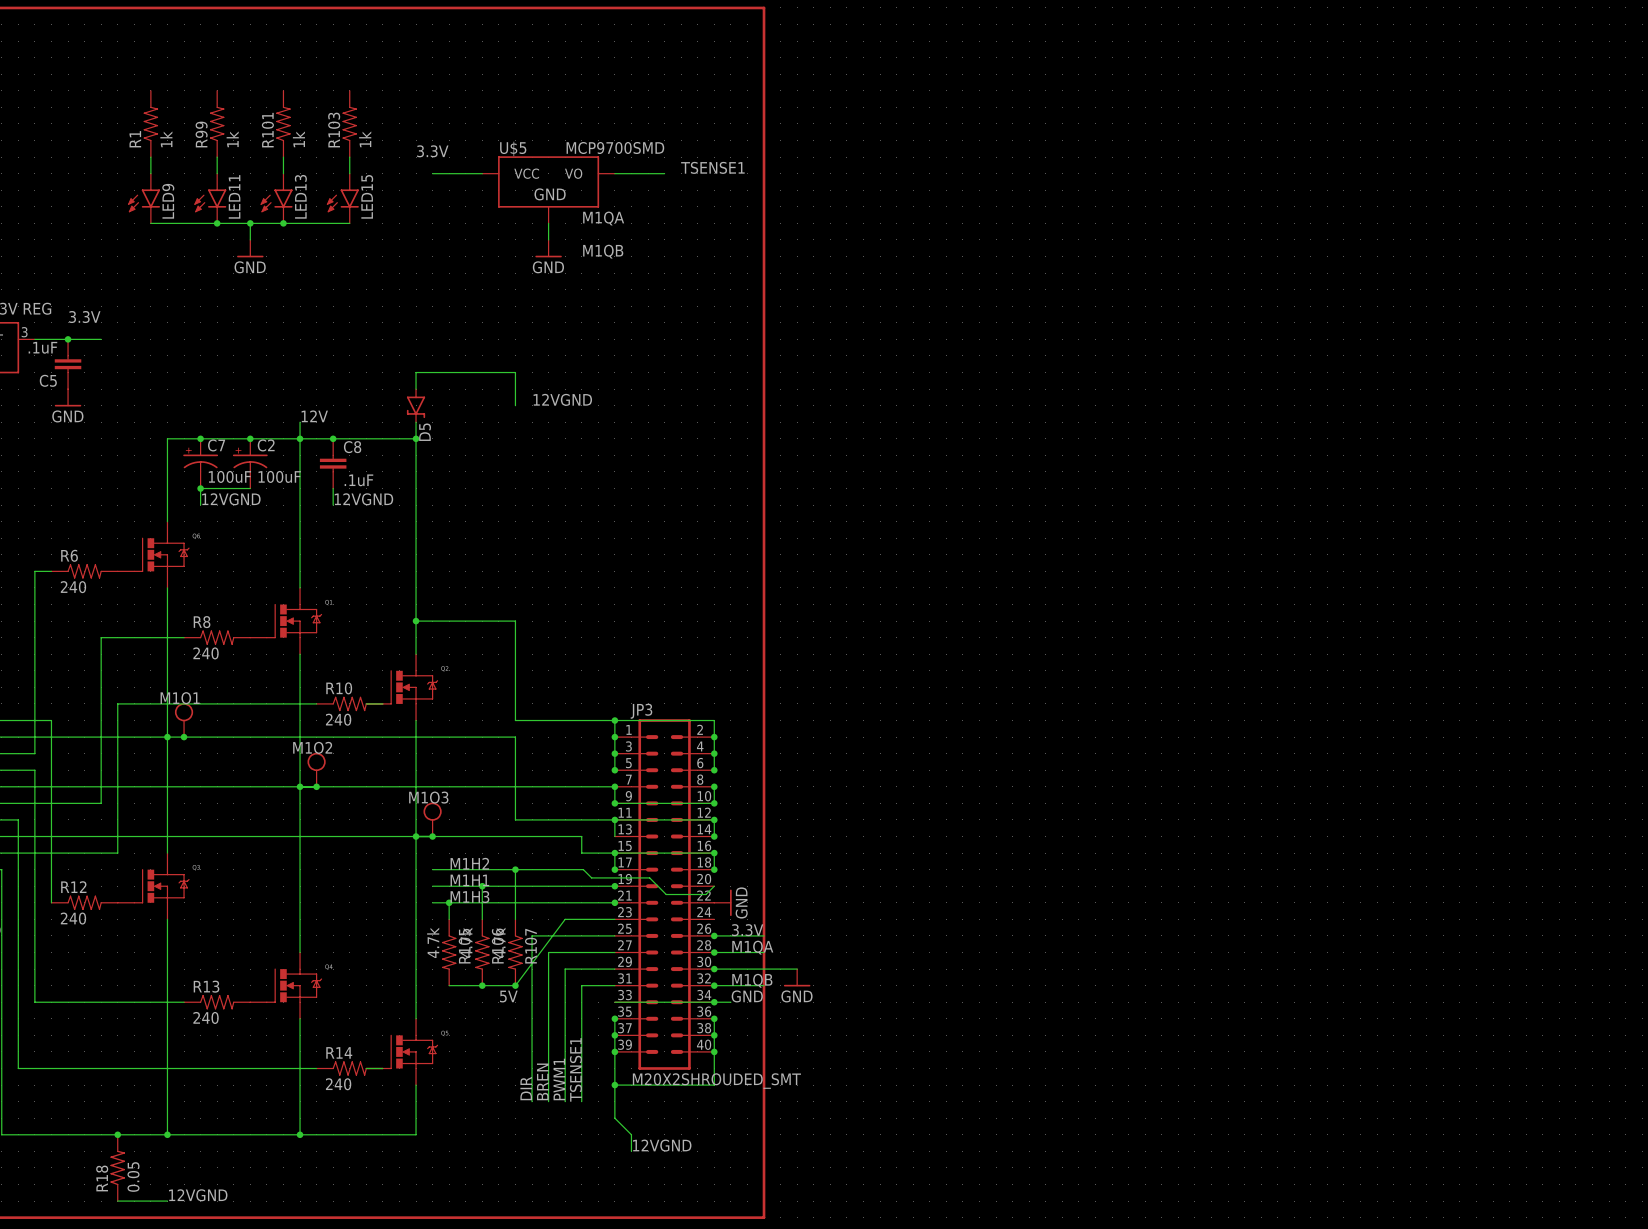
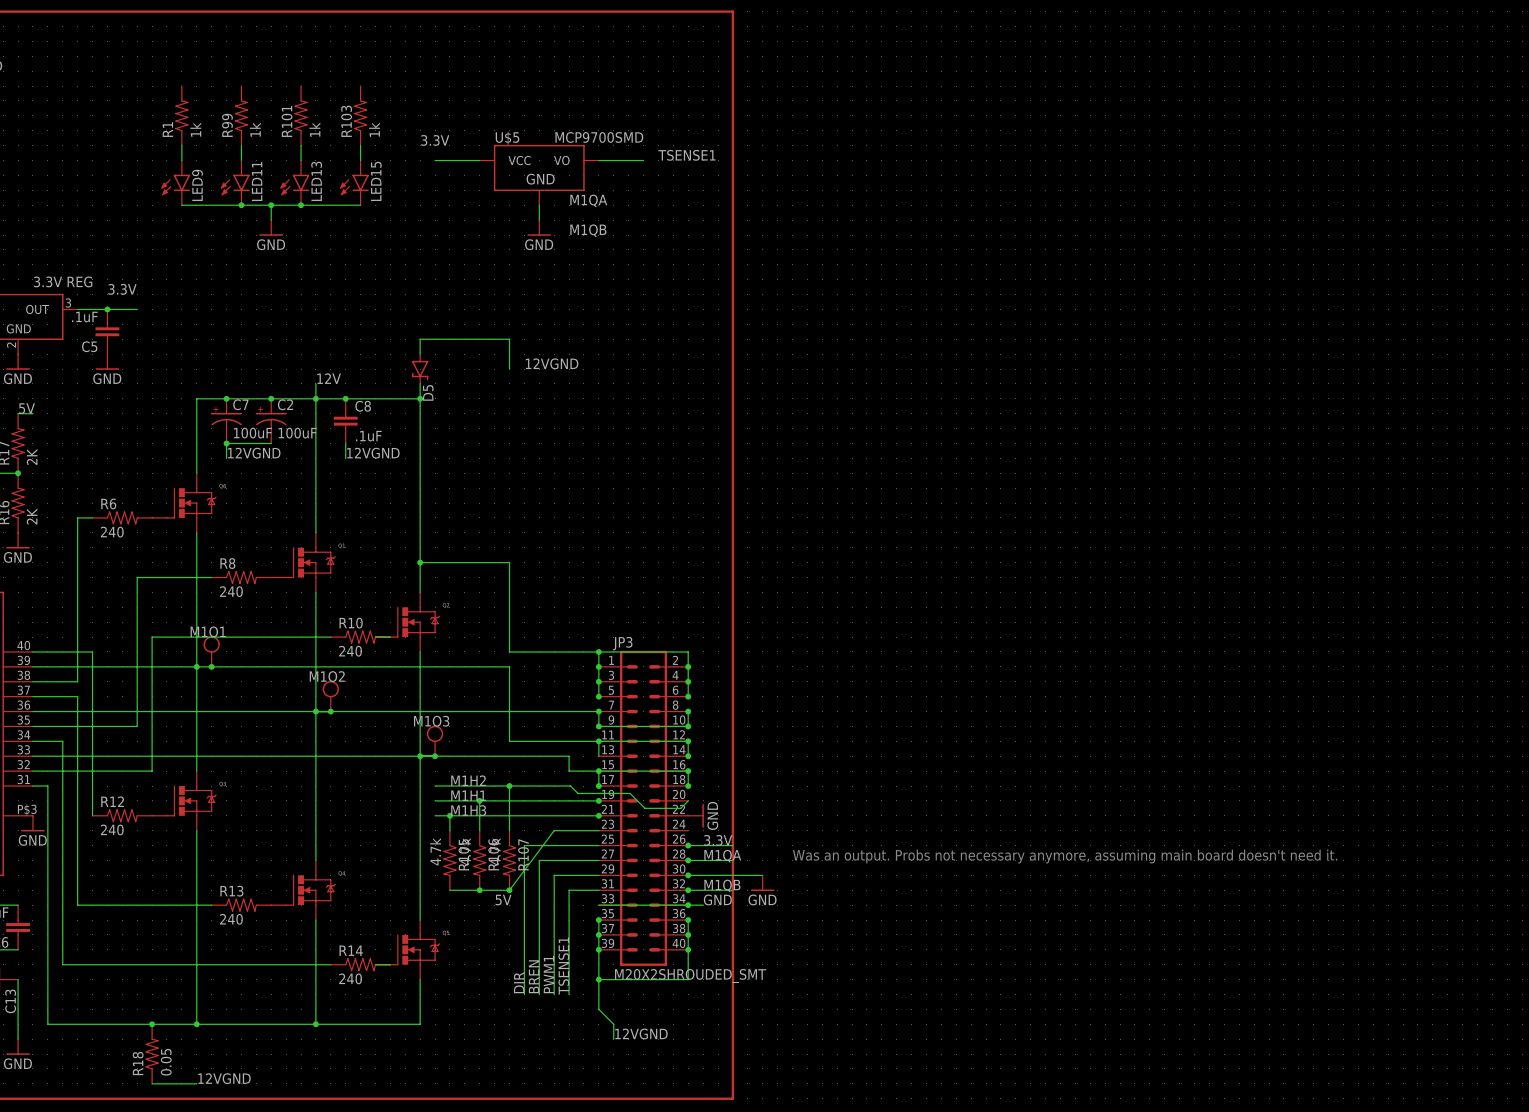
text: none -> Was an output. Probs not necessary anymore, assuming main board doesn't need it. (1065, 856)

